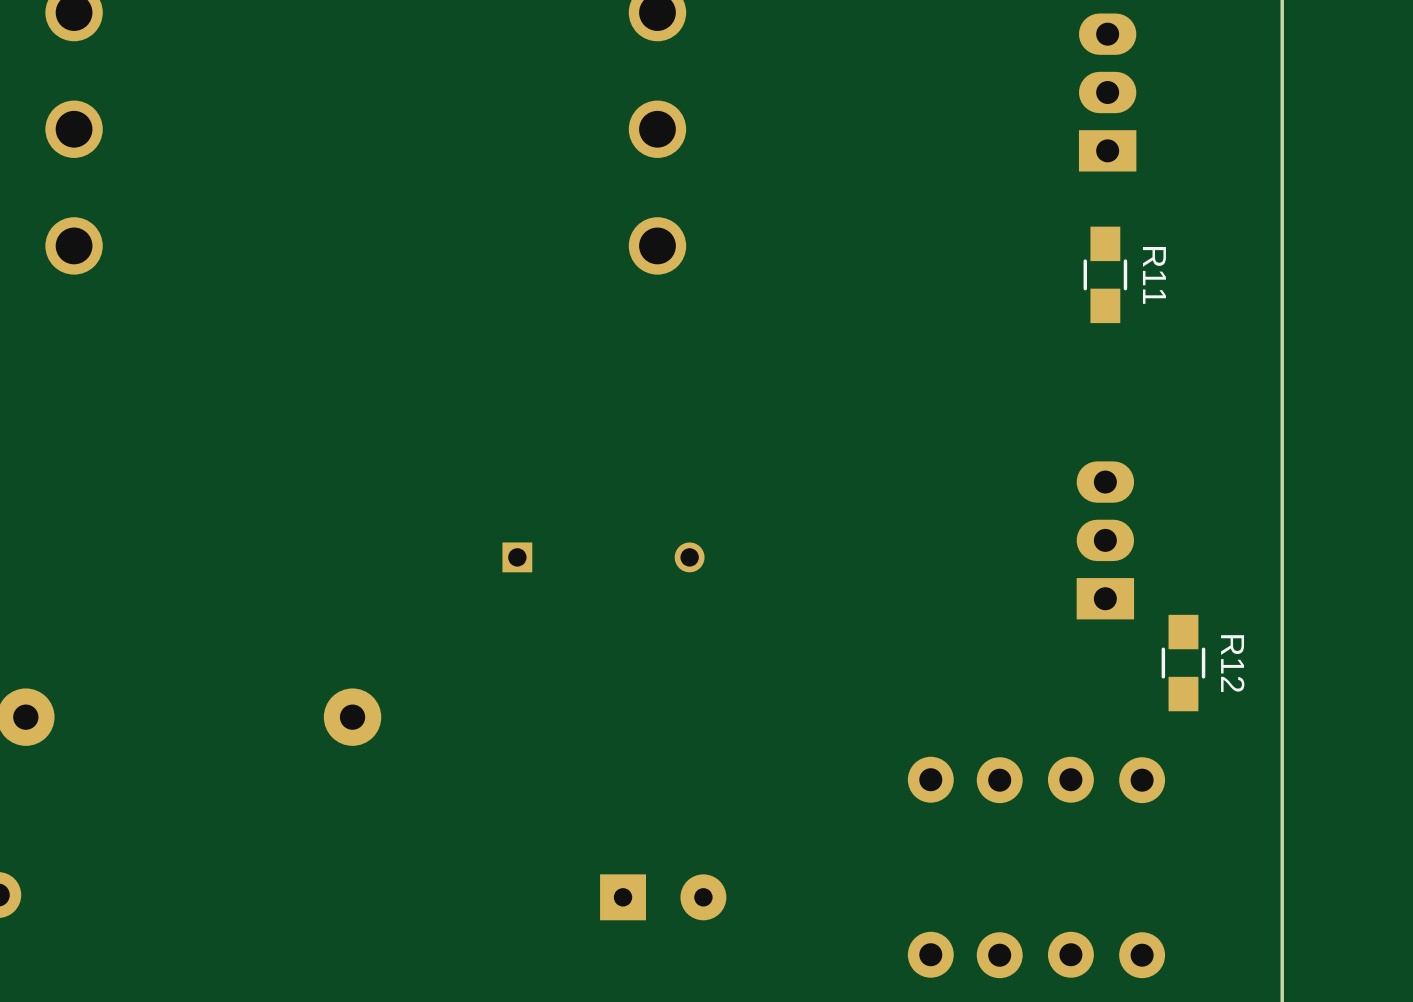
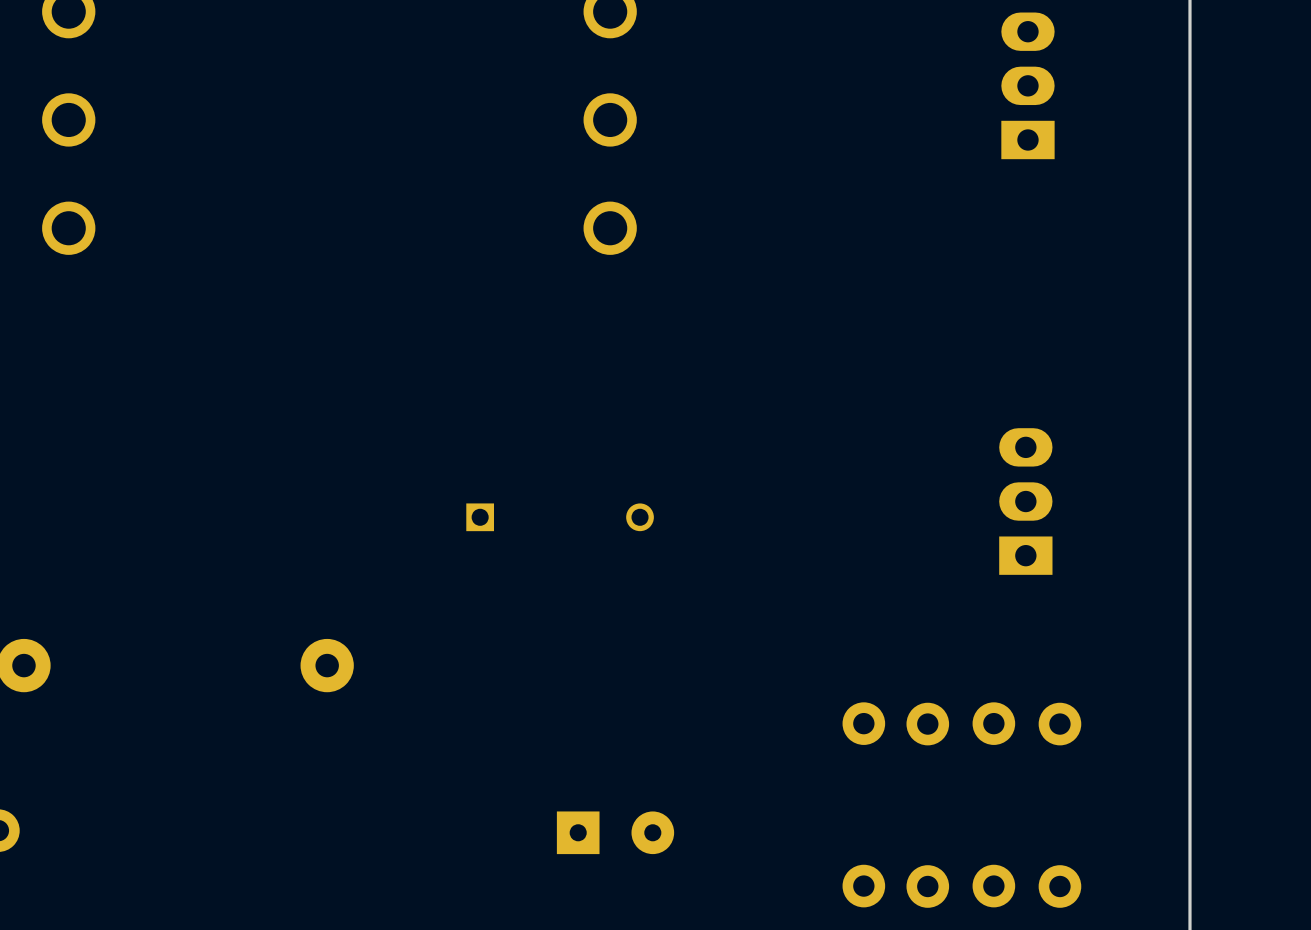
R11: (1105, 274) -> none
R12: (1183, 663) -> none

